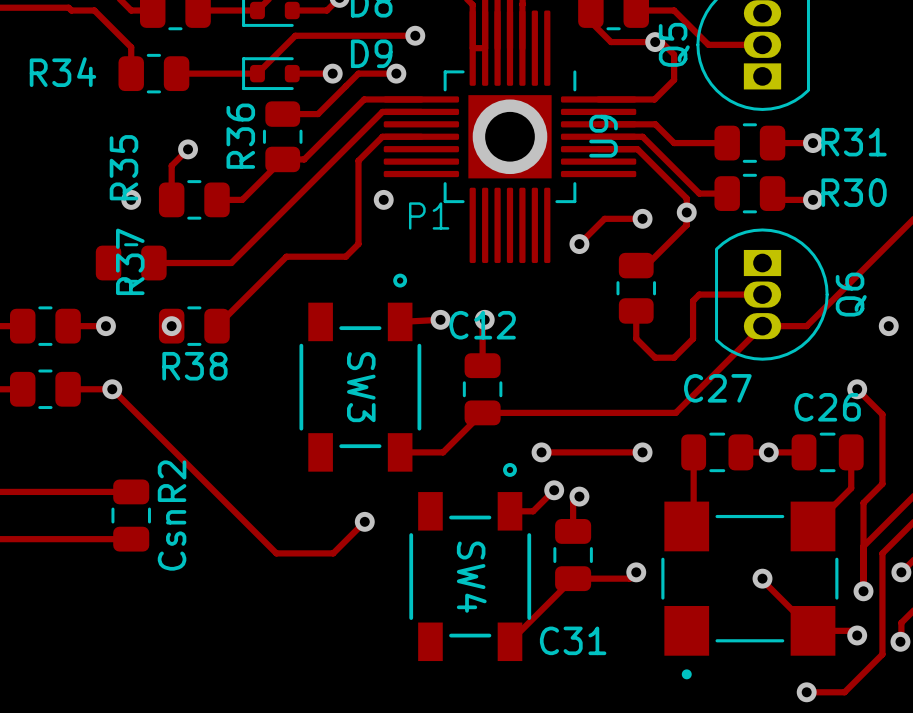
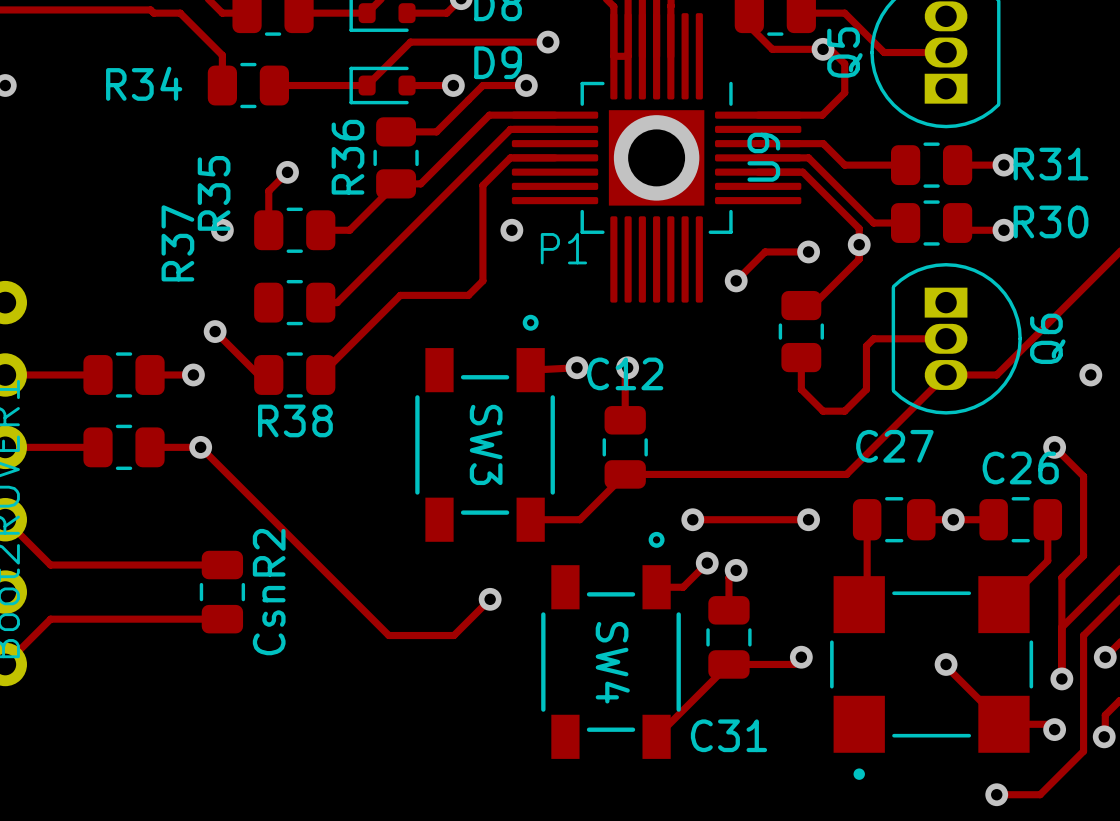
R37 name position: R37 (130, 261) -> R37 (177, 243)
R37 position: (131, 263) -> (294, 302)
track: (153, 263) (217, 263) -> none
track: none -> (215, 331) (258, 374)
via position: (171, 326) -> (215, 331)

